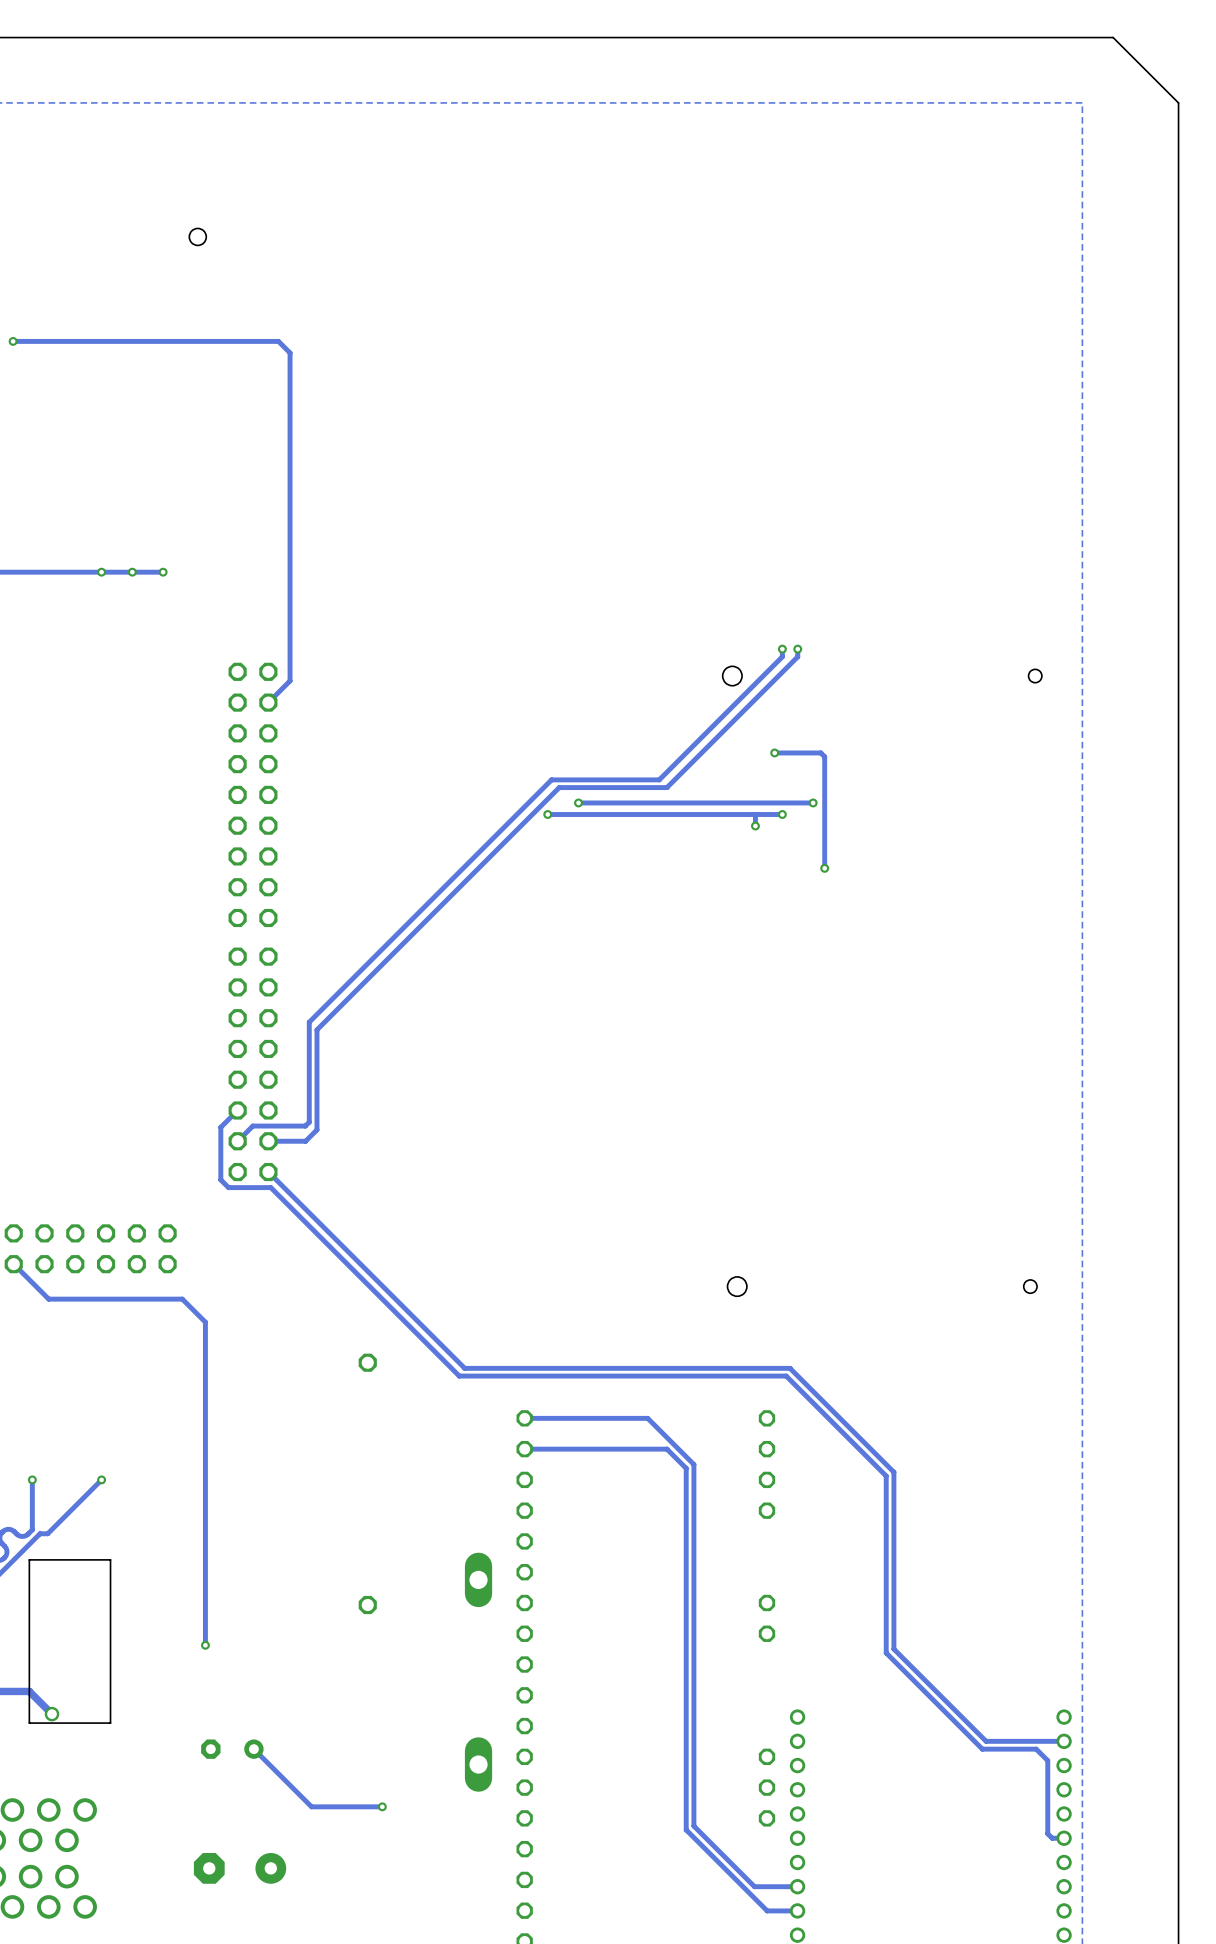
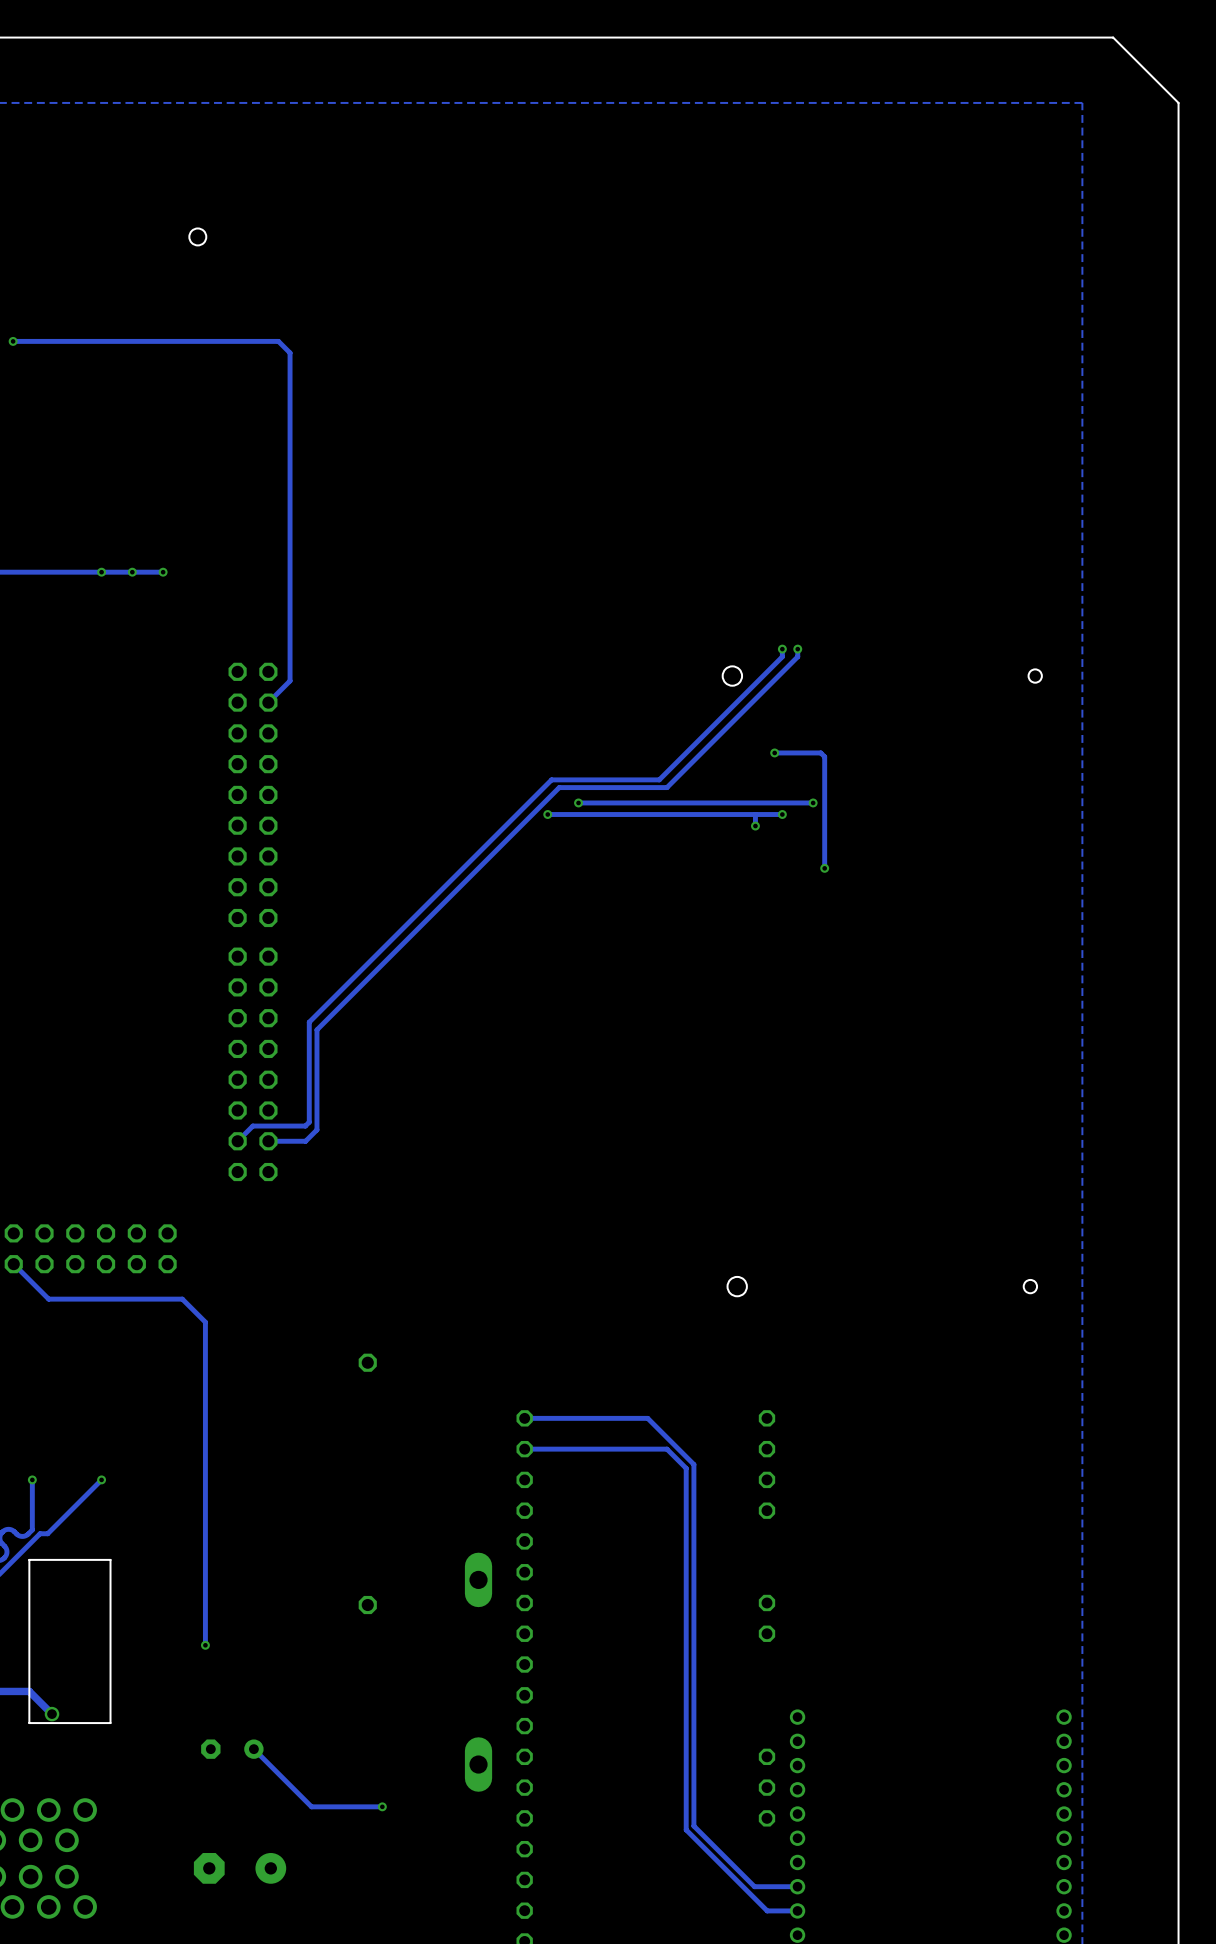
track: (237, 1110) (220, 1127) (220, 1179) (228, 1187) (270, 1187) (459, 1376) (786, 1376) (886, 1476) (886, 1652) (982, 1749) (1036, 1749) (1047, 1760) (1047, 1833) (1052, 1838) (1064, 1838) -> none
track: (268, 1172) (464, 1368) (790, 1368) (893, 1472) (893, 1649) (986, 1741) (1064, 1741) -> none

